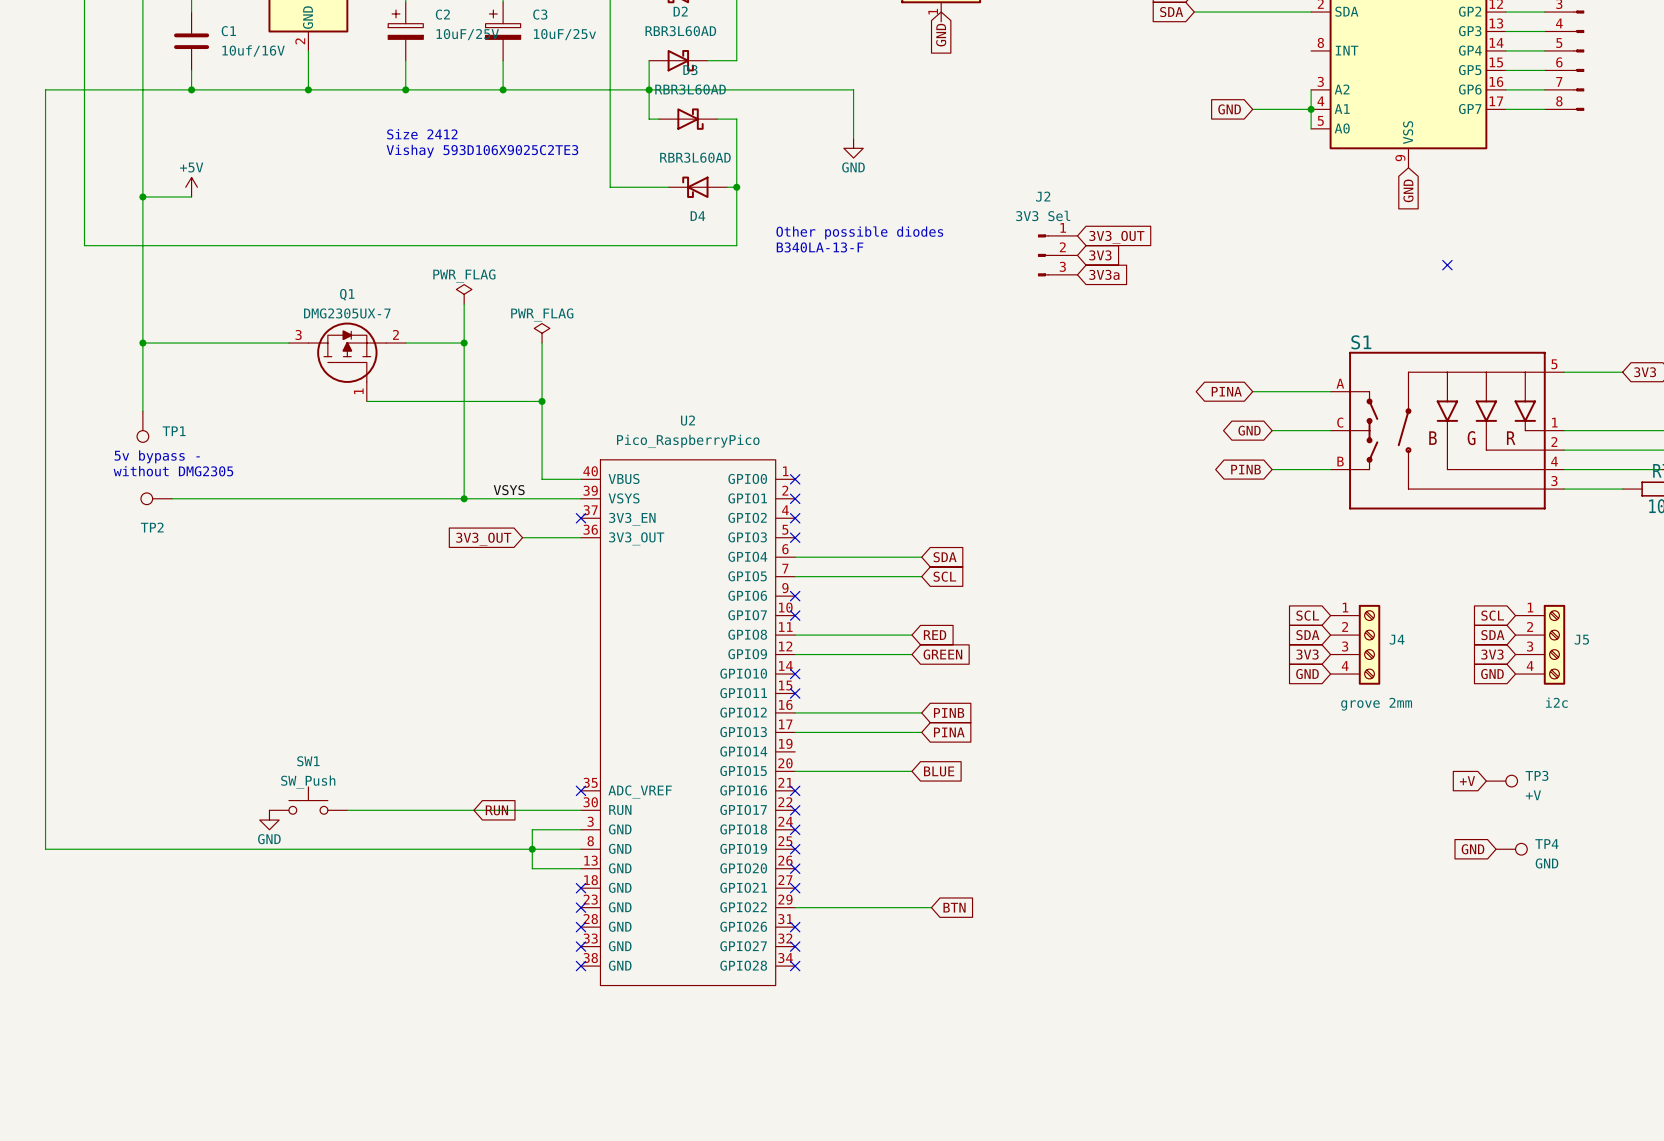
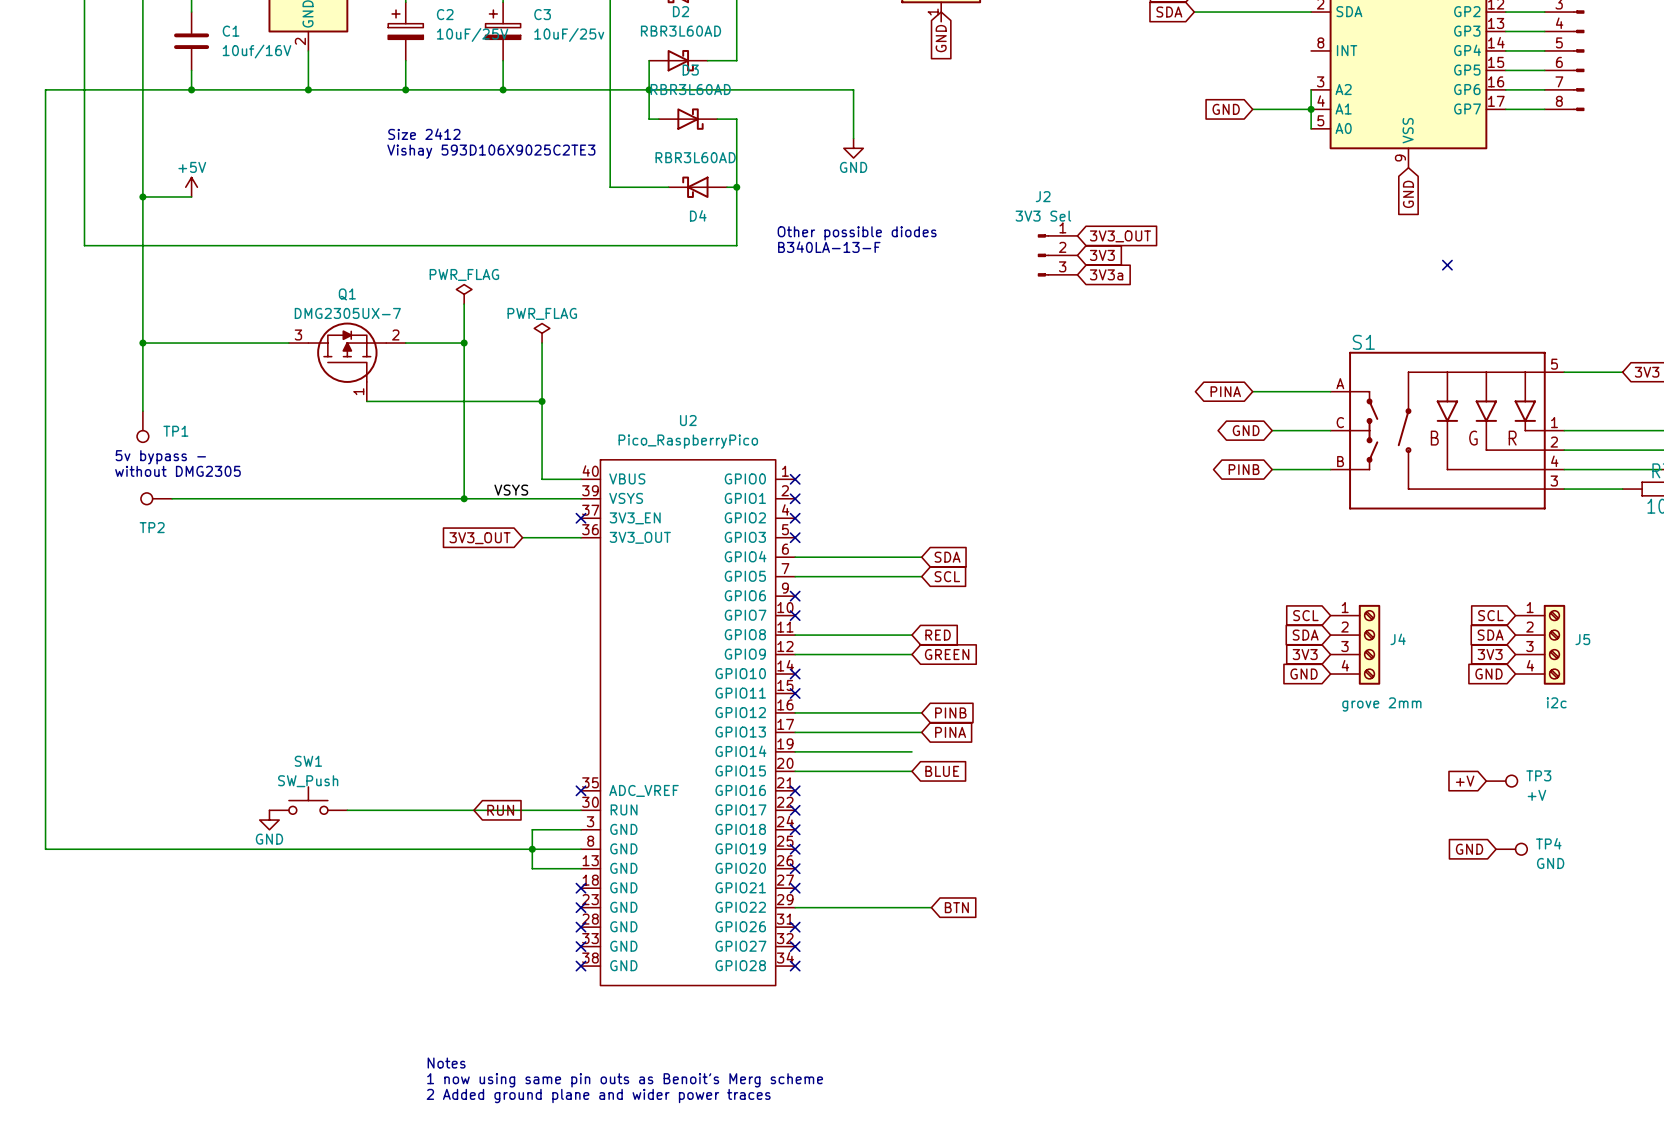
wire: none -> (795, 751) (911, 751)
text: none -> Notes (446, 1063)
text: none -> 1 now using same pin outs as Benoit's Merg scheme (625, 1080)
text: none -> 2 Added ground plane and wider power traces (598, 1096)

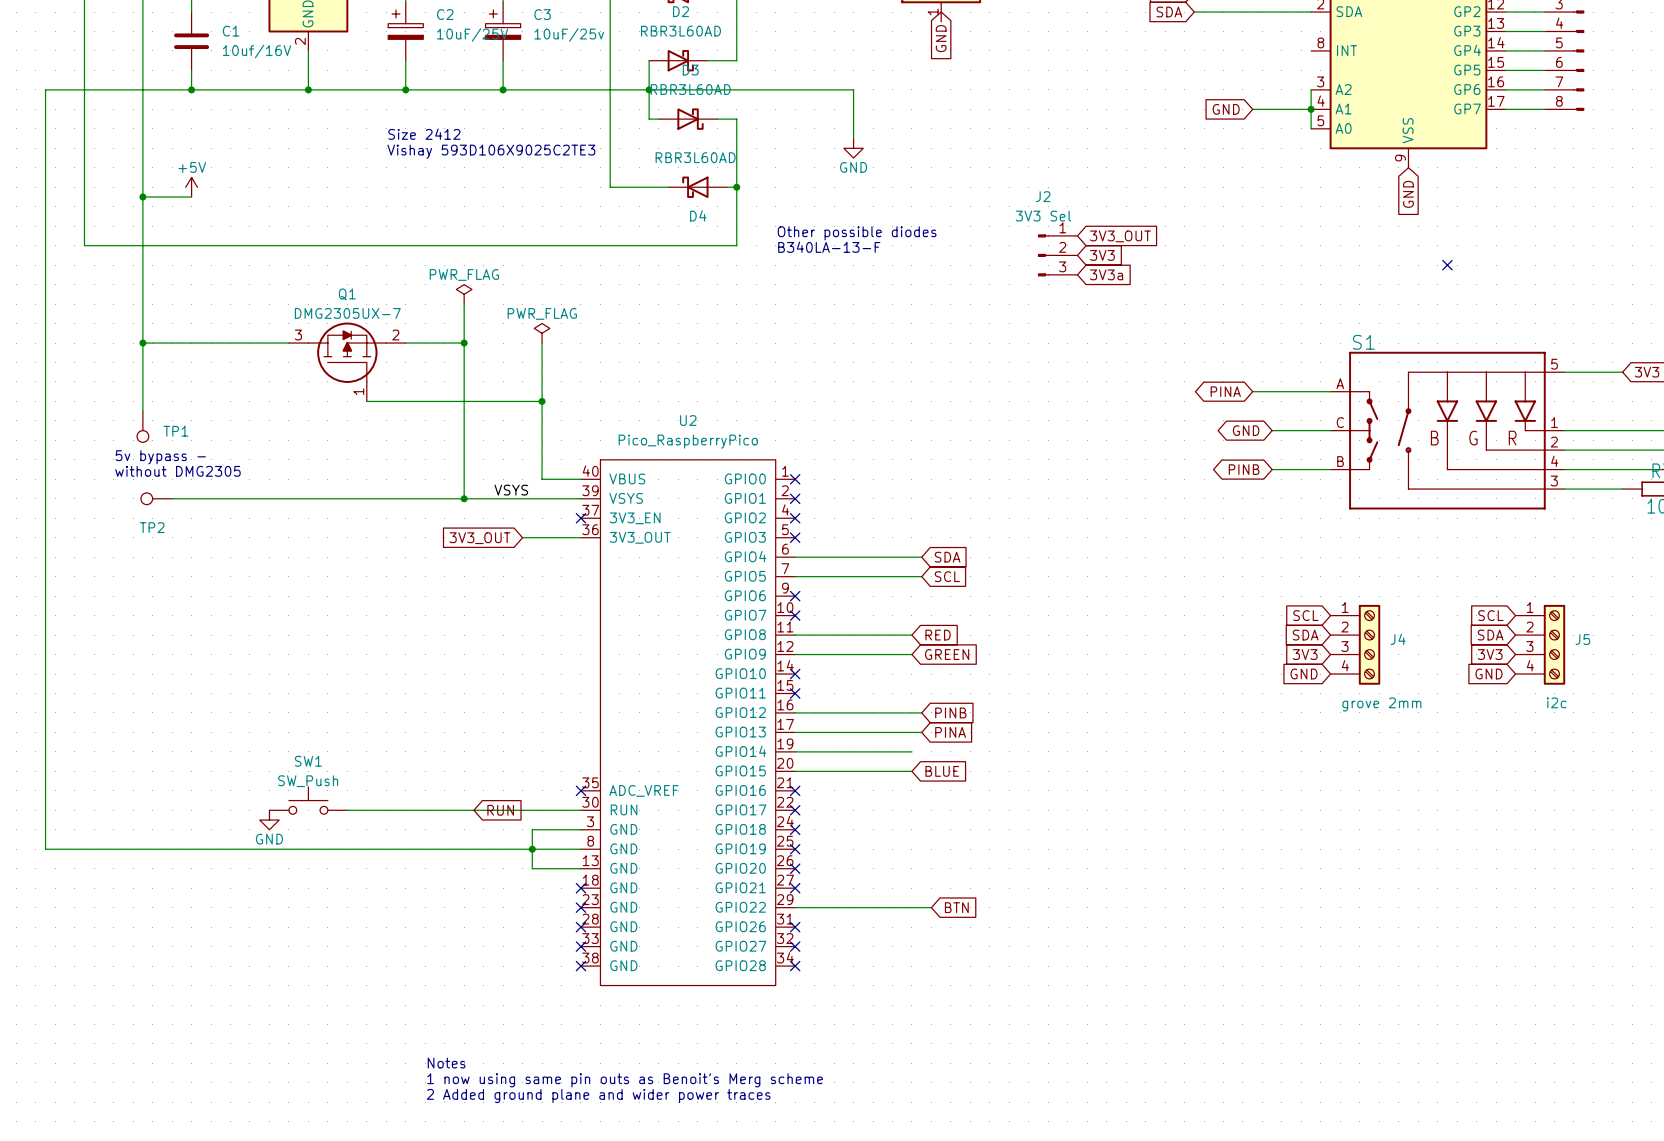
global label: +V (1465, 781) -> none
TP3: +V (1501, 781) -> none
global label: GND (1469, 849) -> none
TP4: GND (1511, 849) -> none

